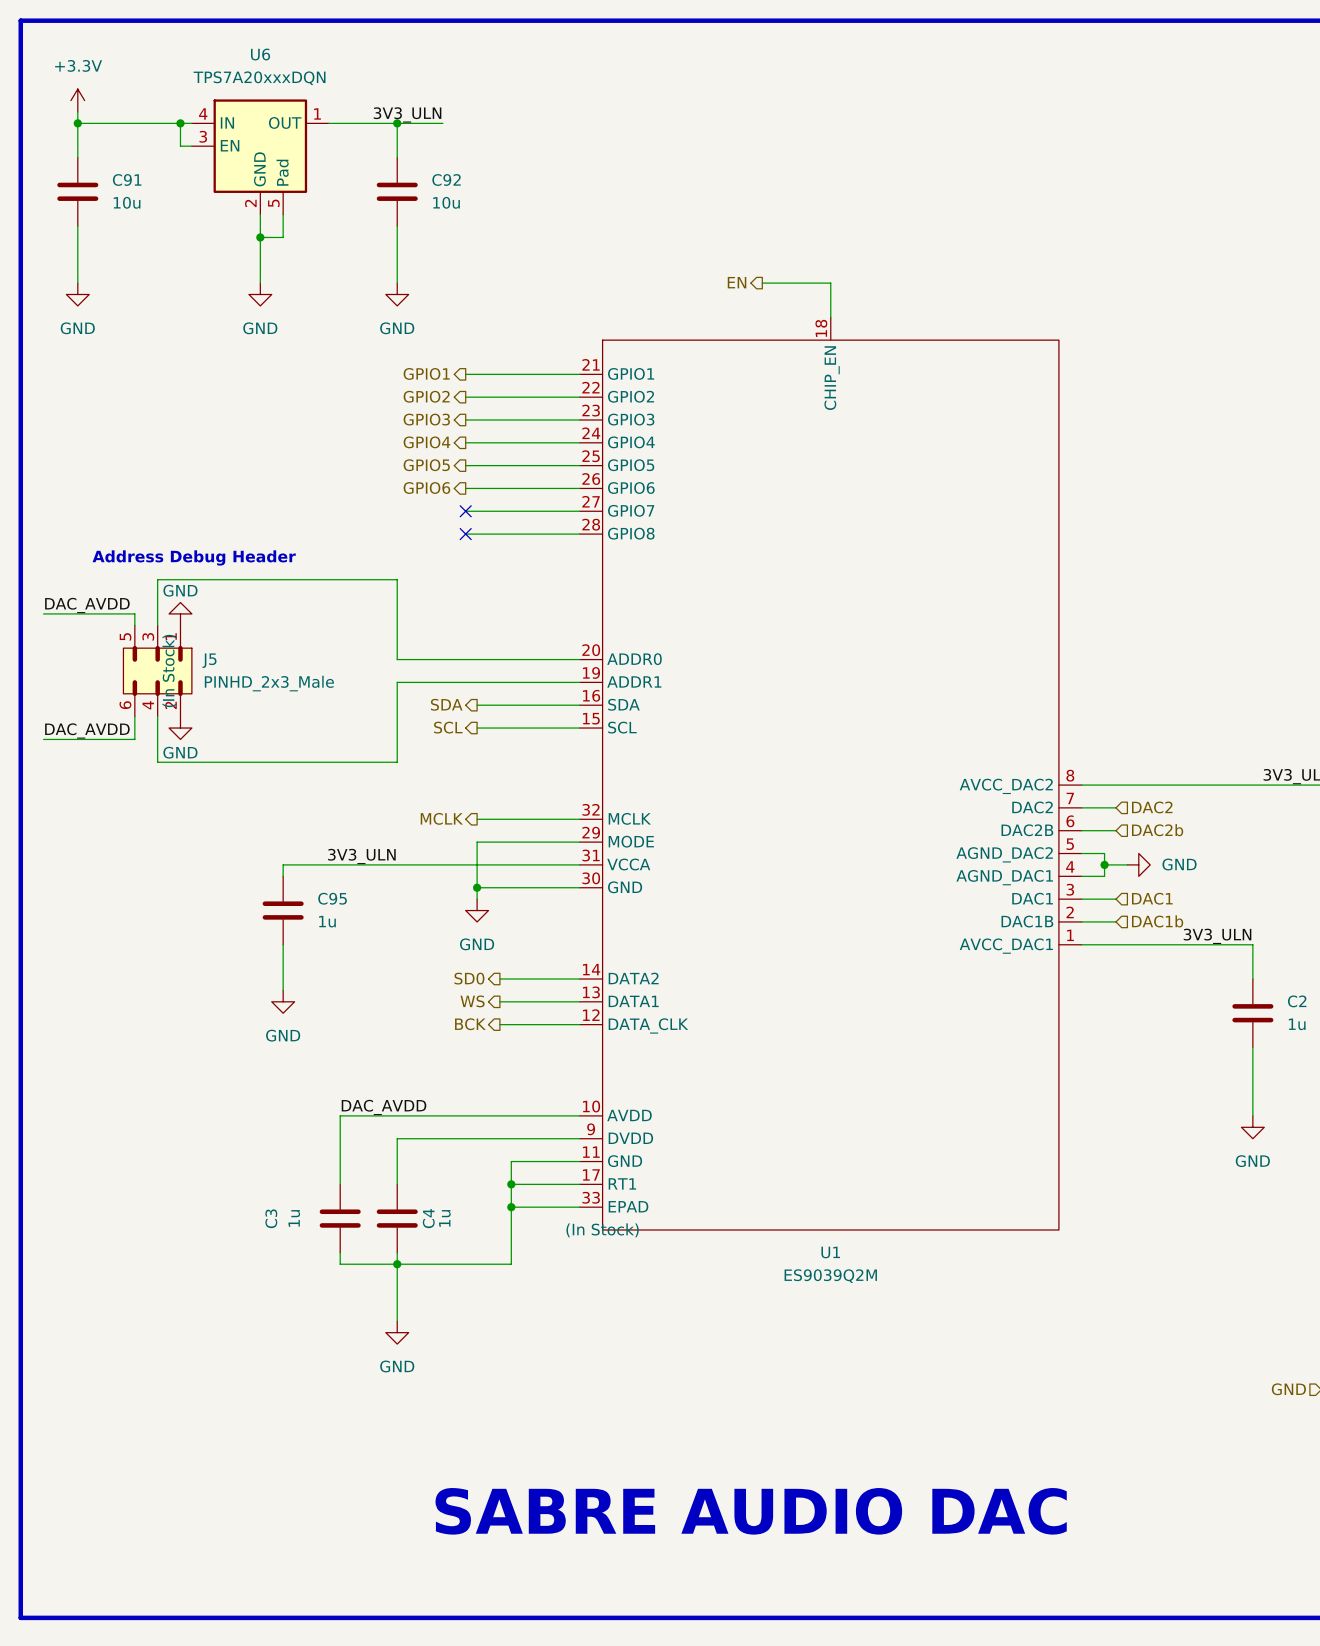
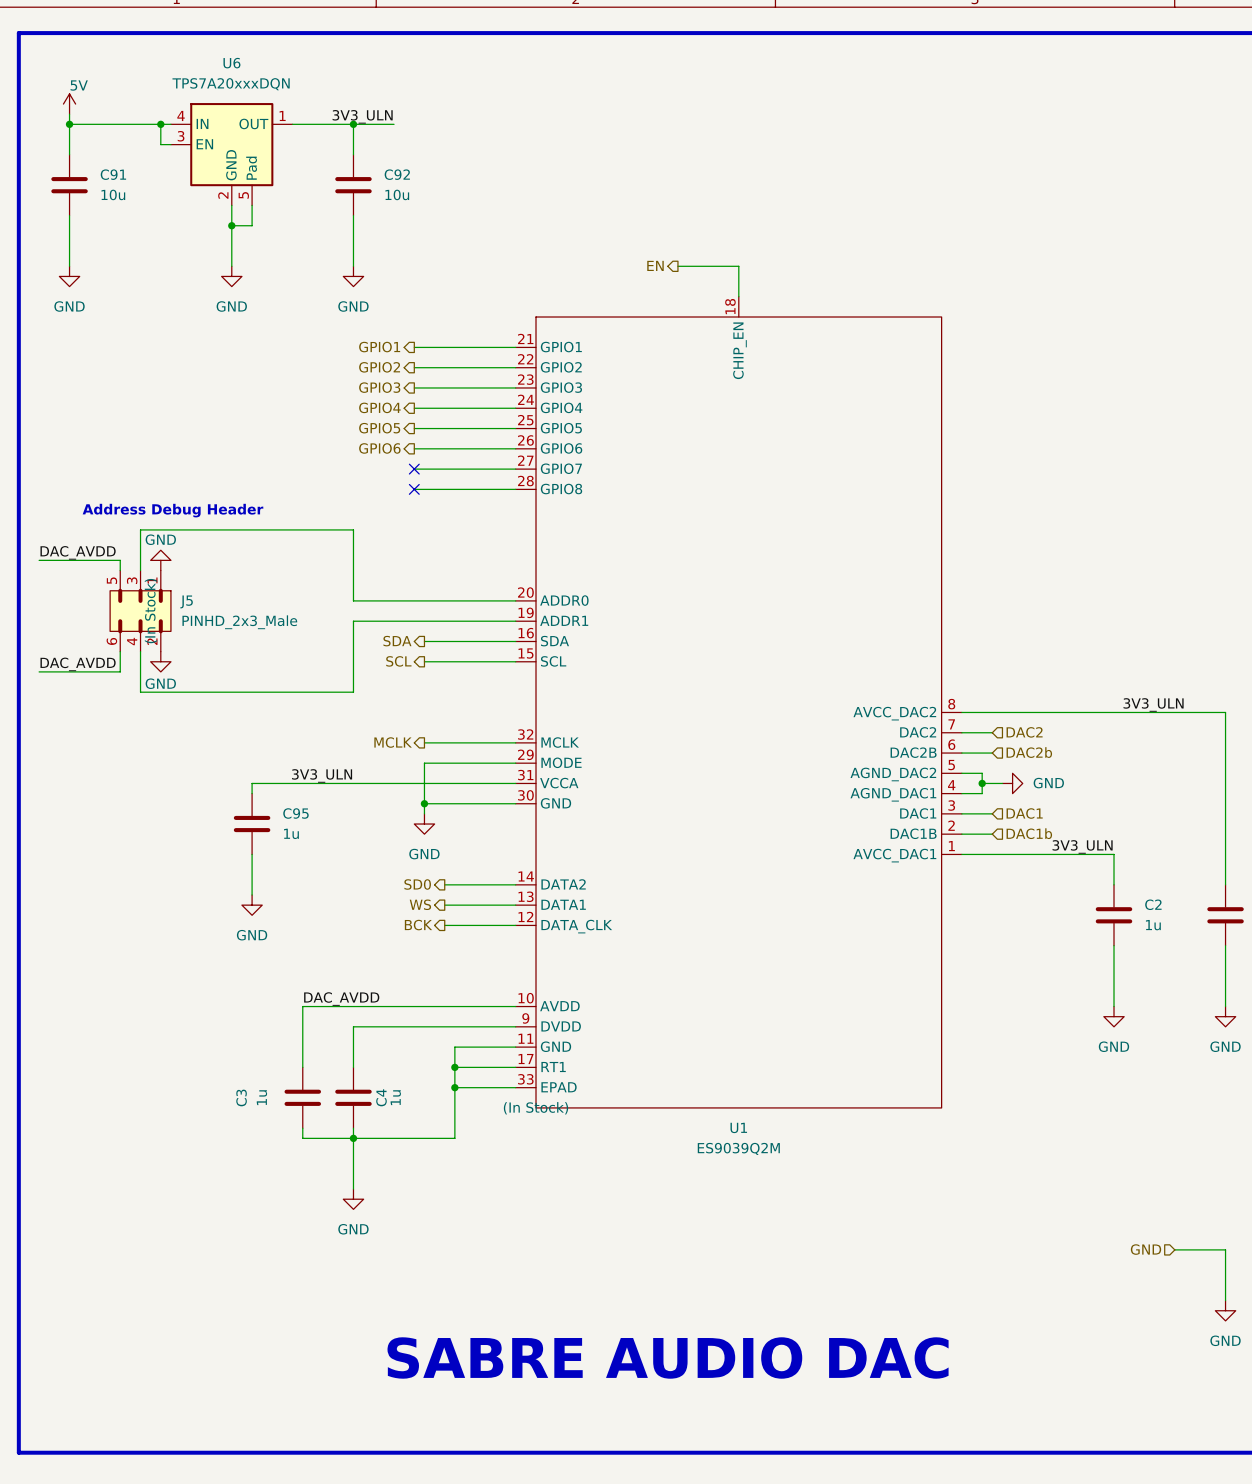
power symbol: +3.3V (77, 100) -> 5V (69, 104)

